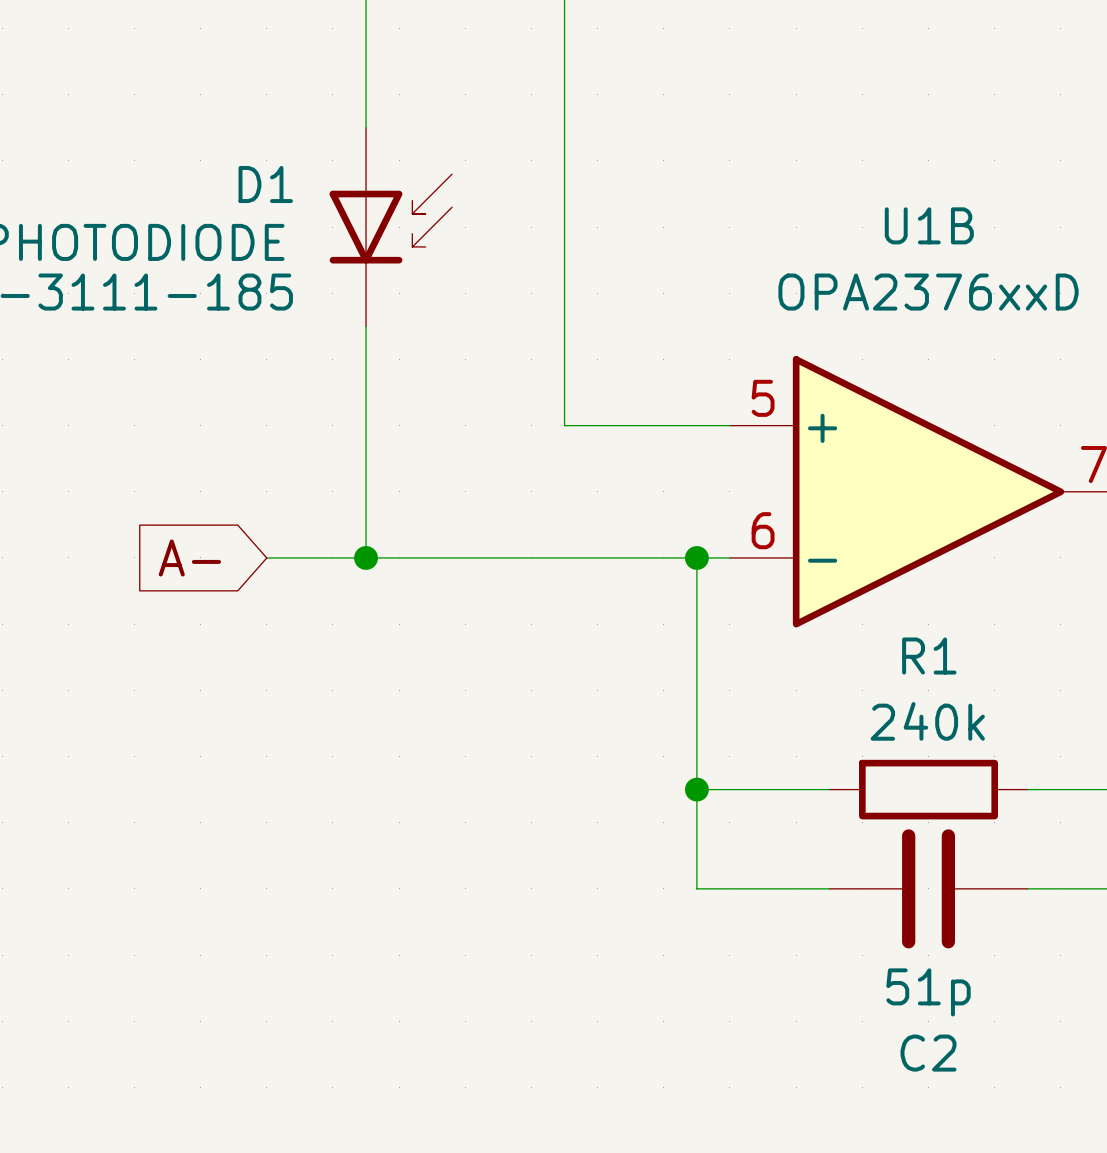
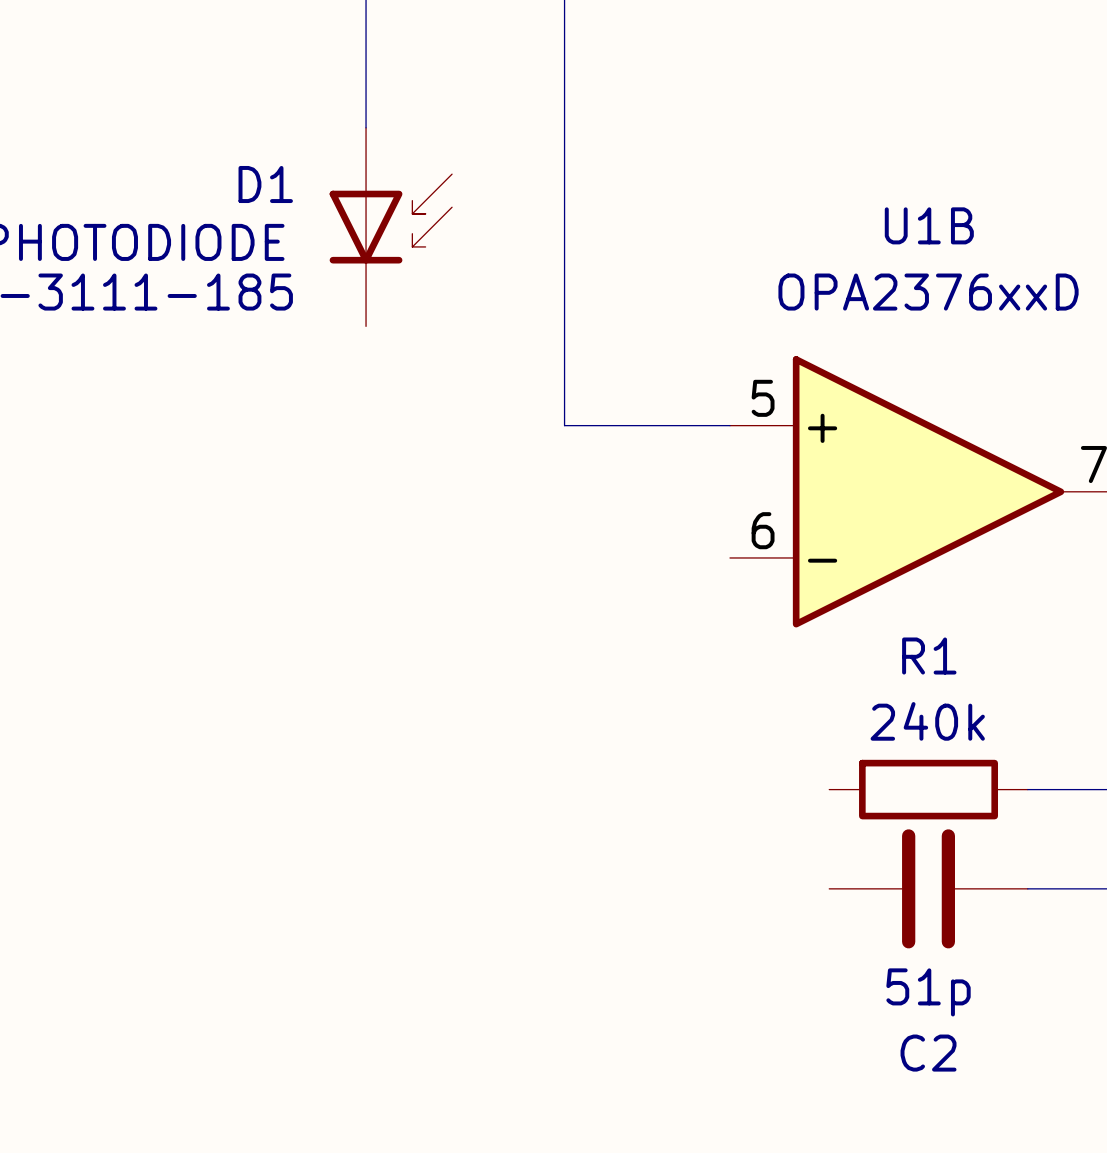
wire: (366, 326) (366, 557) -> none
global label: A- (189, 557) -> none
wire: (266, 557) (729, 557) -> none
junction: (366, 557) -> none
wire: (696, 557) (696, 888) (829, 888) -> none
junction: (696, 557) -> none
wire: (696, 789) (829, 789) -> none
junction: (696, 789) -> none

